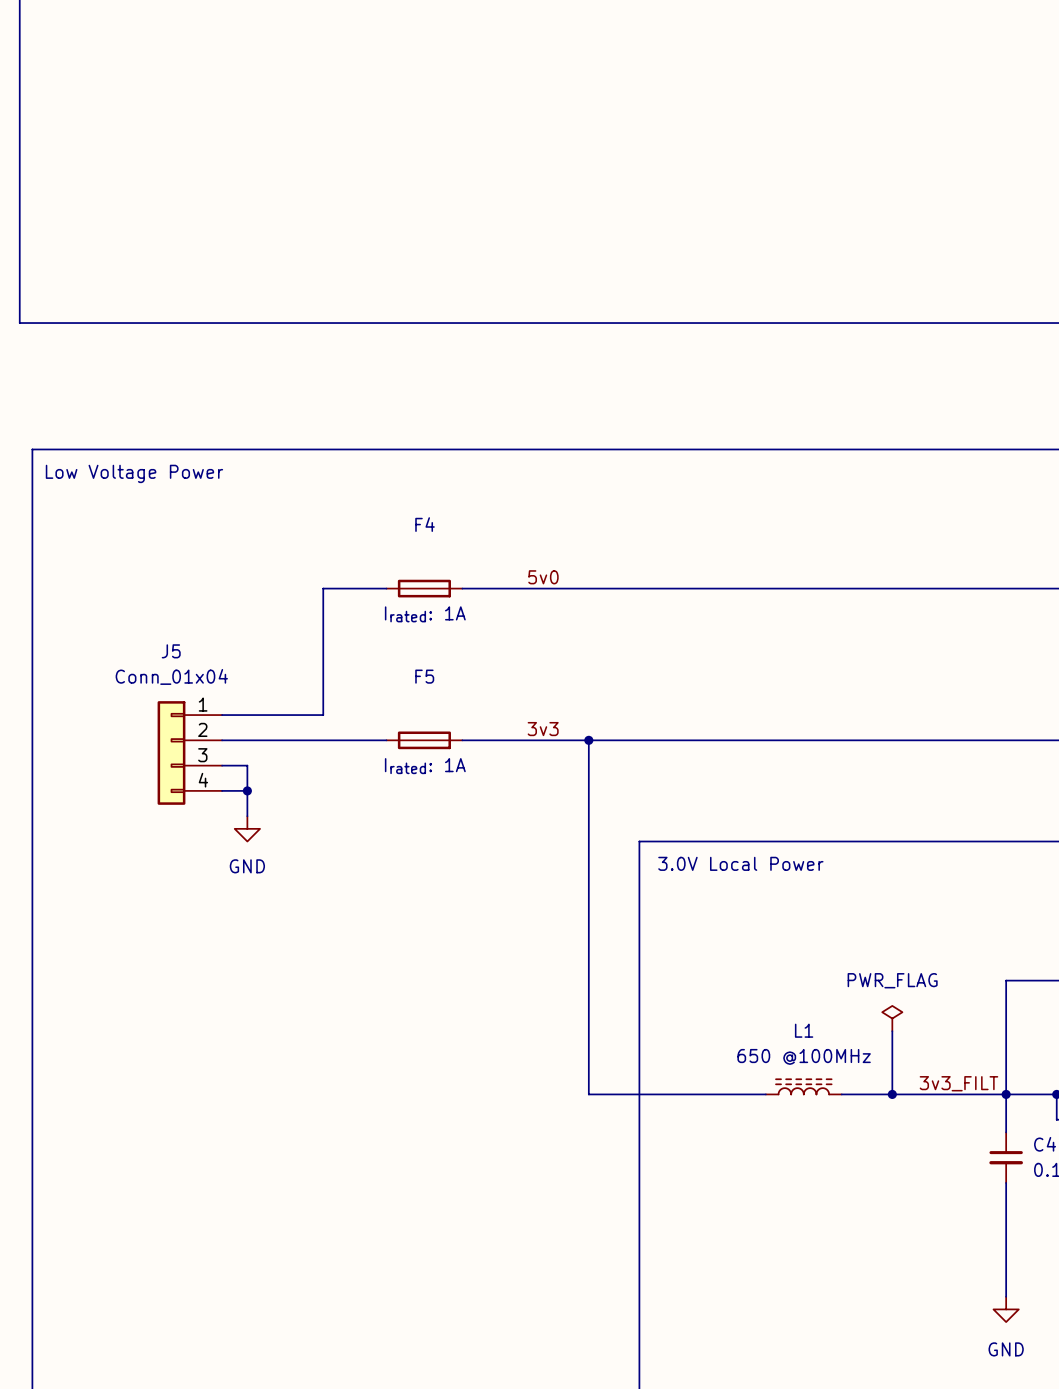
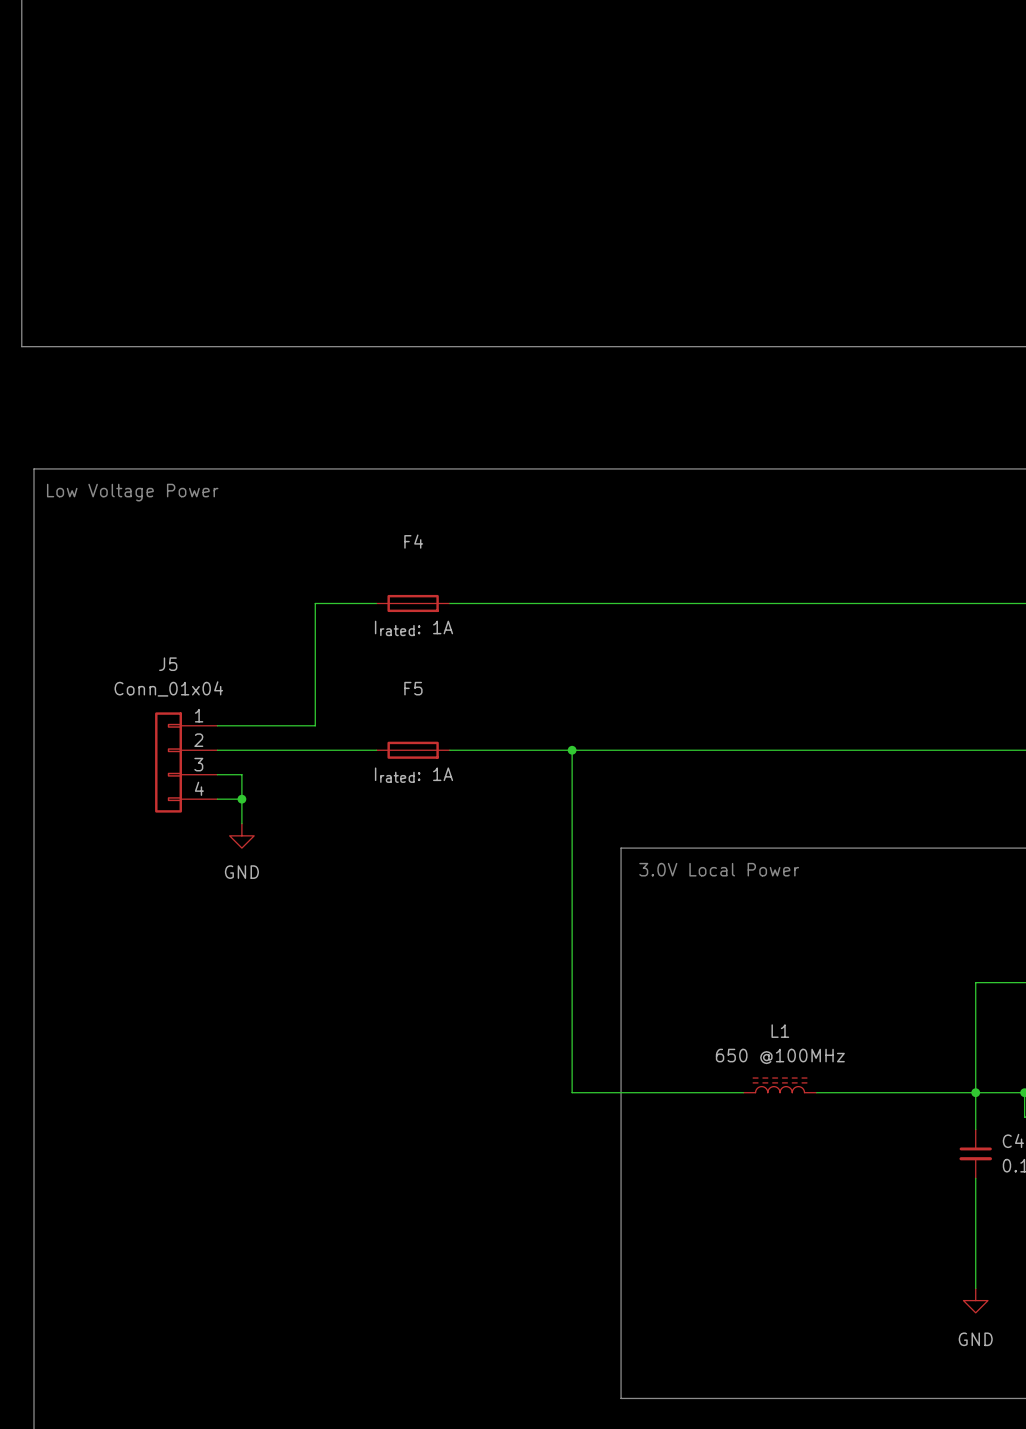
label: 5v0 (543, 577) -> none
label: 3v3 (543, 729) -> none
power symbol: PWR_FLAG (892, 1018) -> none
wire: (892, 1031) (892, 1094) -> none
label: 3v3_FILT (958, 1083) -> none
junction: (892, 1094) -> none

